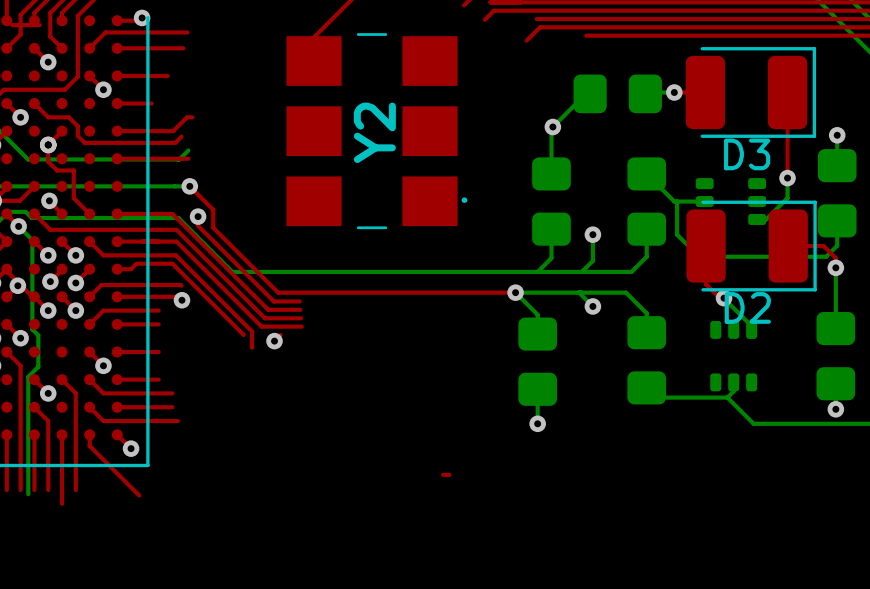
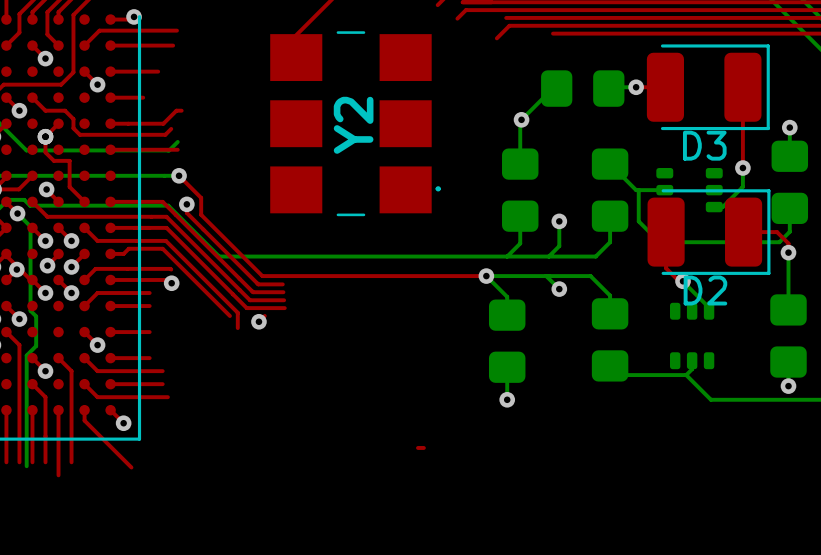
top track: (12, 25) (39, 25) -> none

